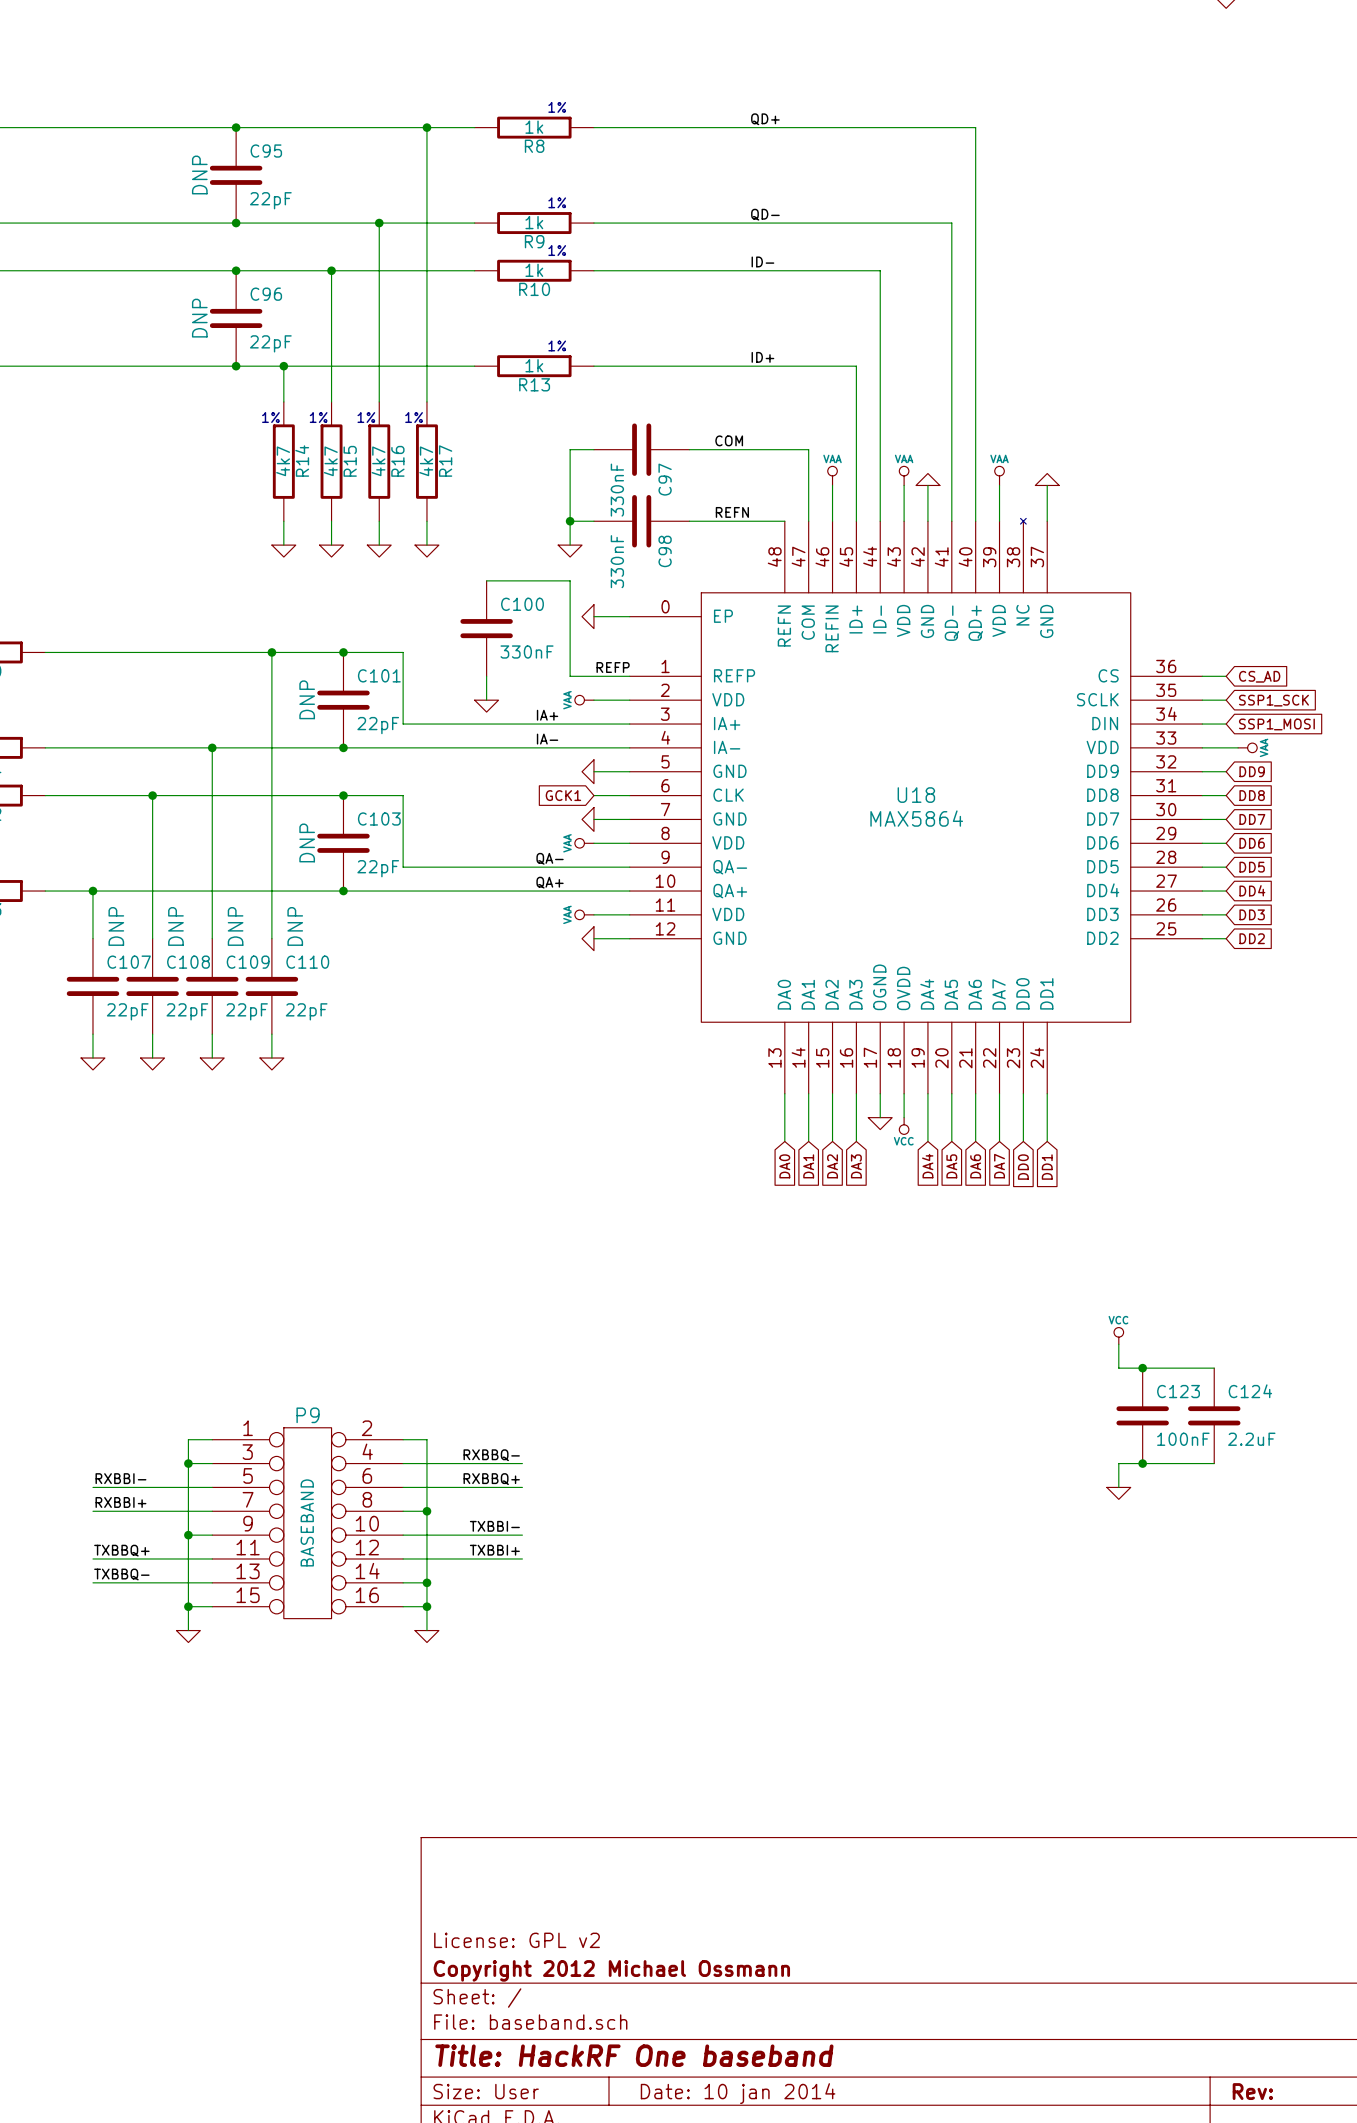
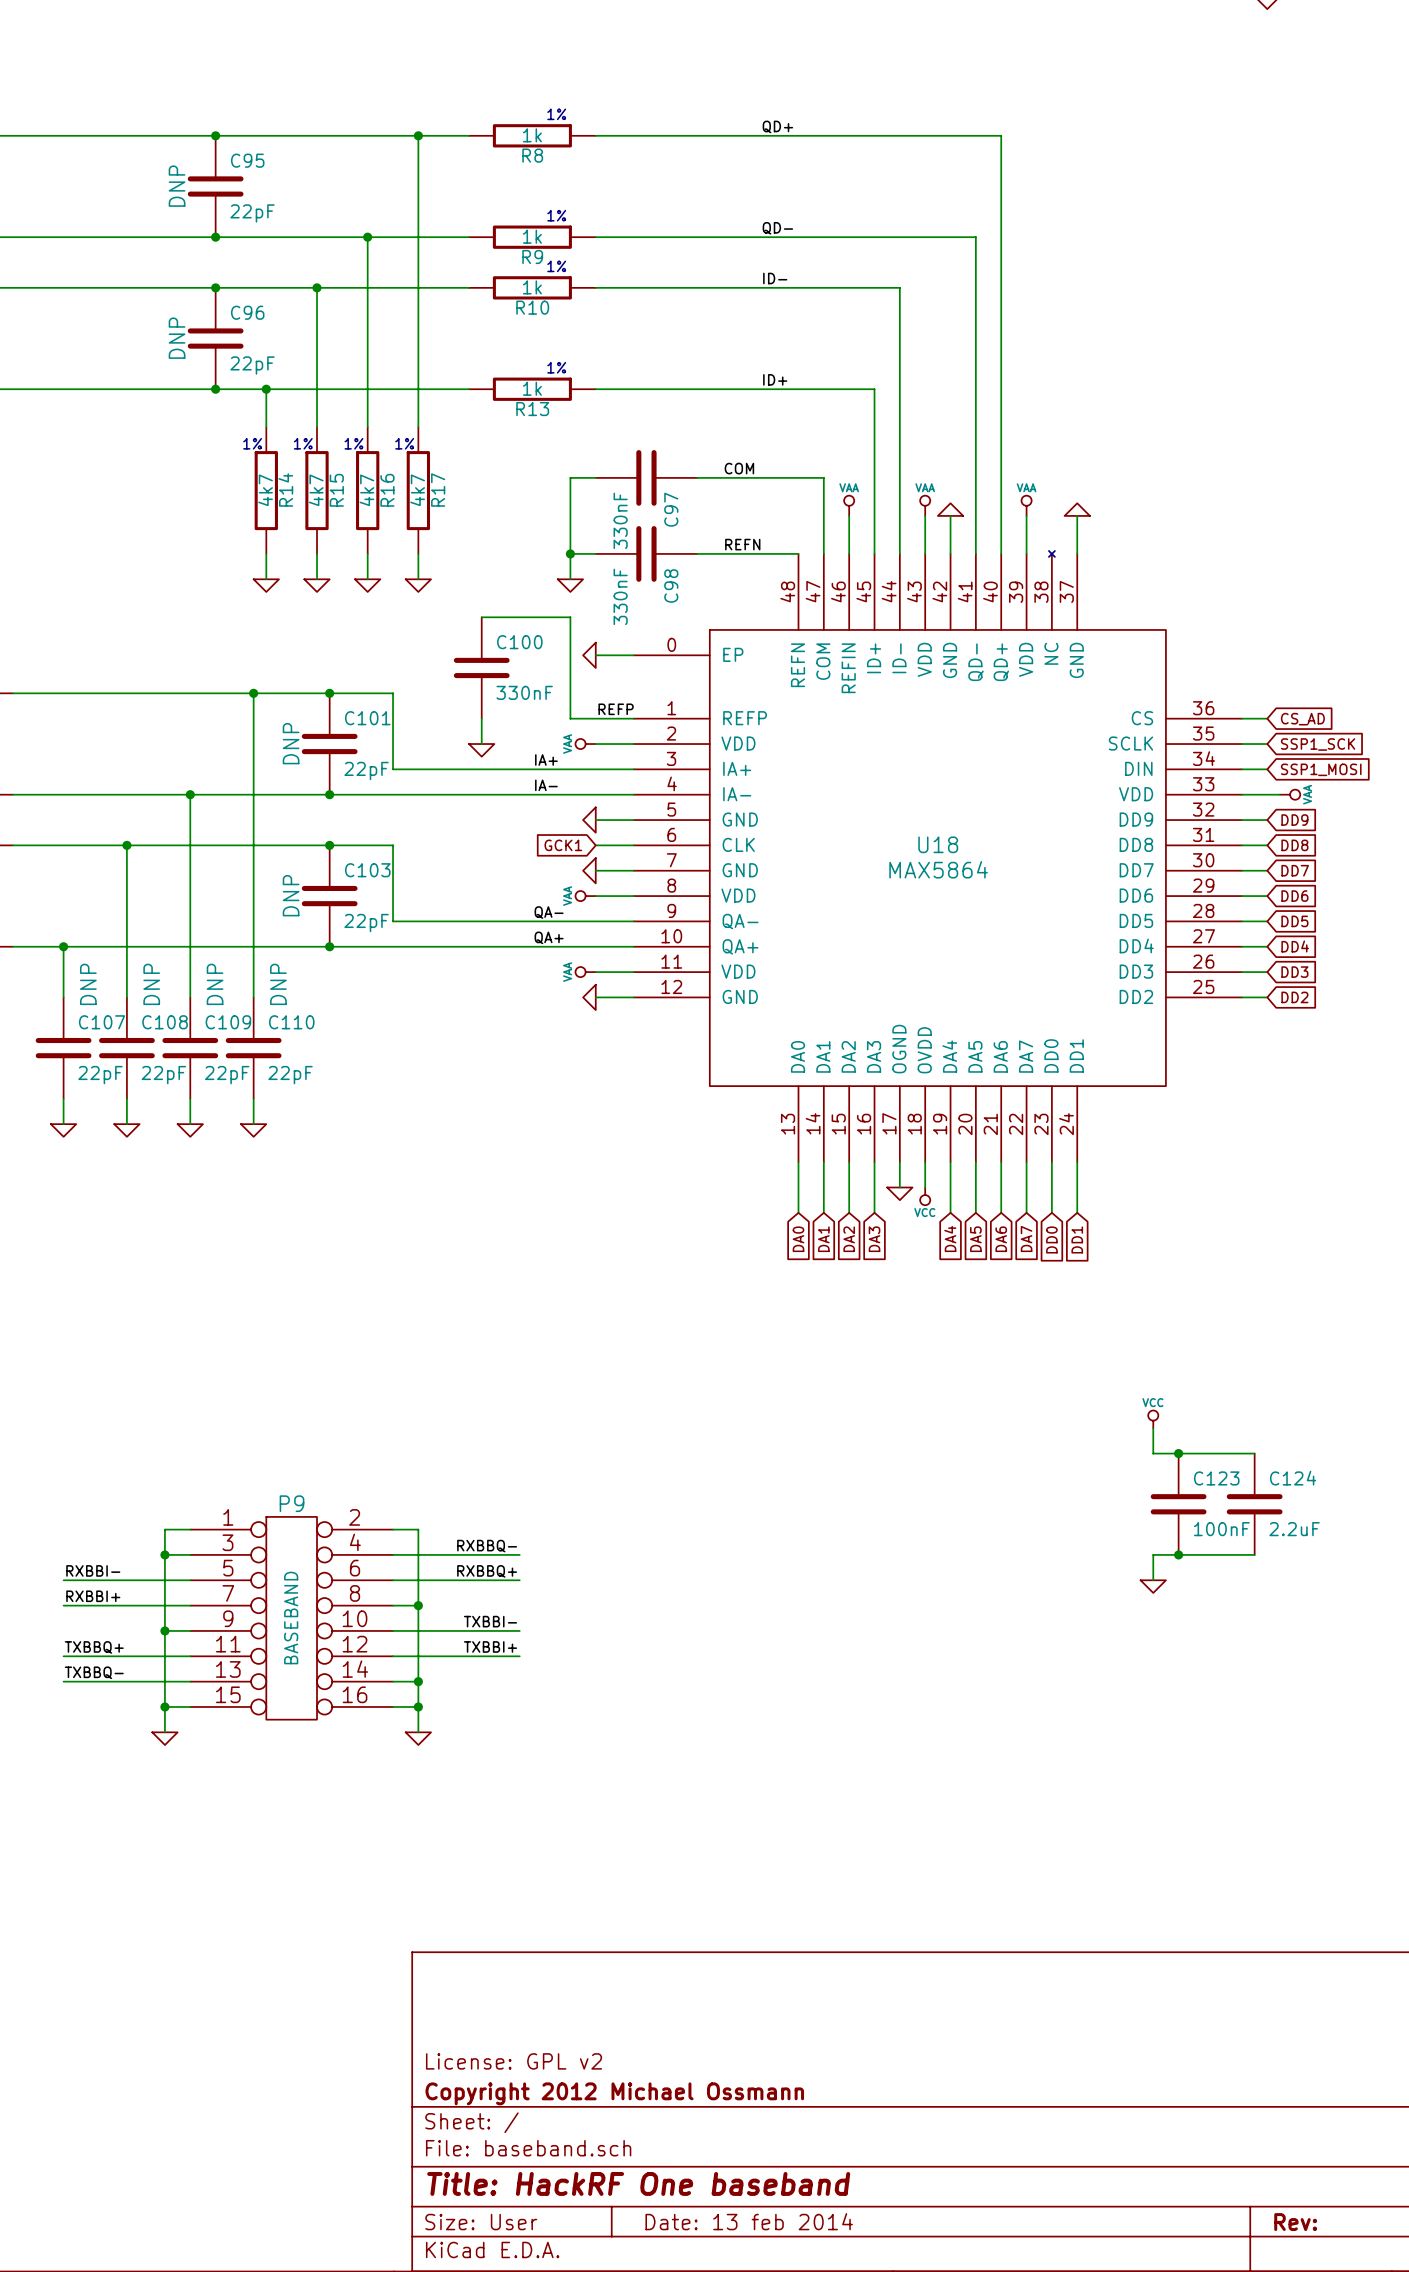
title block: Date: 10 jan 2014 (738, 2093) -> Date: 13 feb 2014 (749, 2221)

